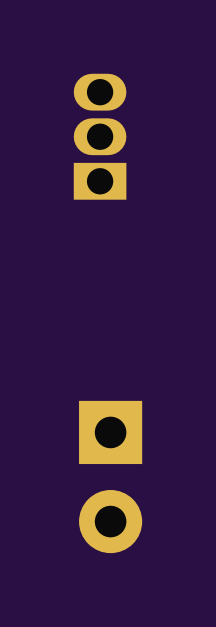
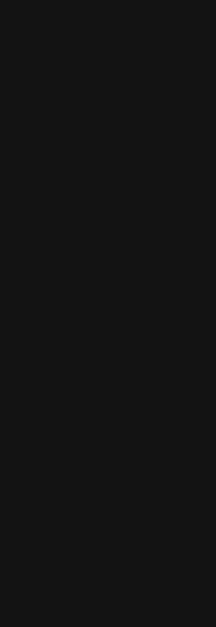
part: (100, 136) -> none
part: (110, 477) -> none

